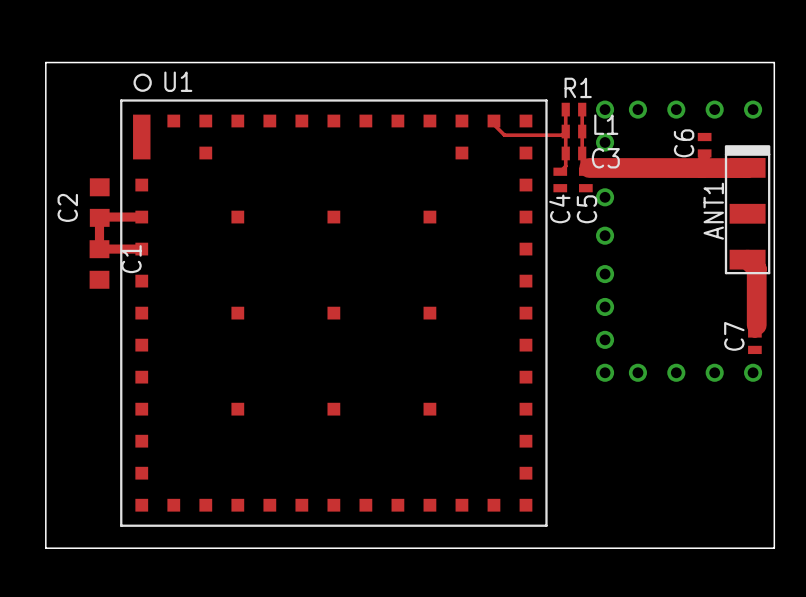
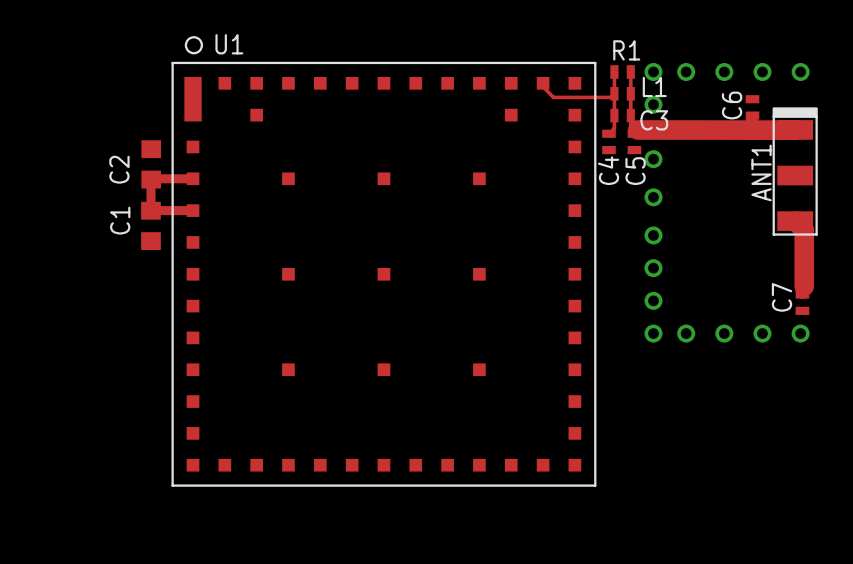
board edge: (45, 62) (774, 62) (774, 548) (45, 548) (45, 62) -> none
C1 name position: C1 (131, 259) -> C1 (120, 220)

